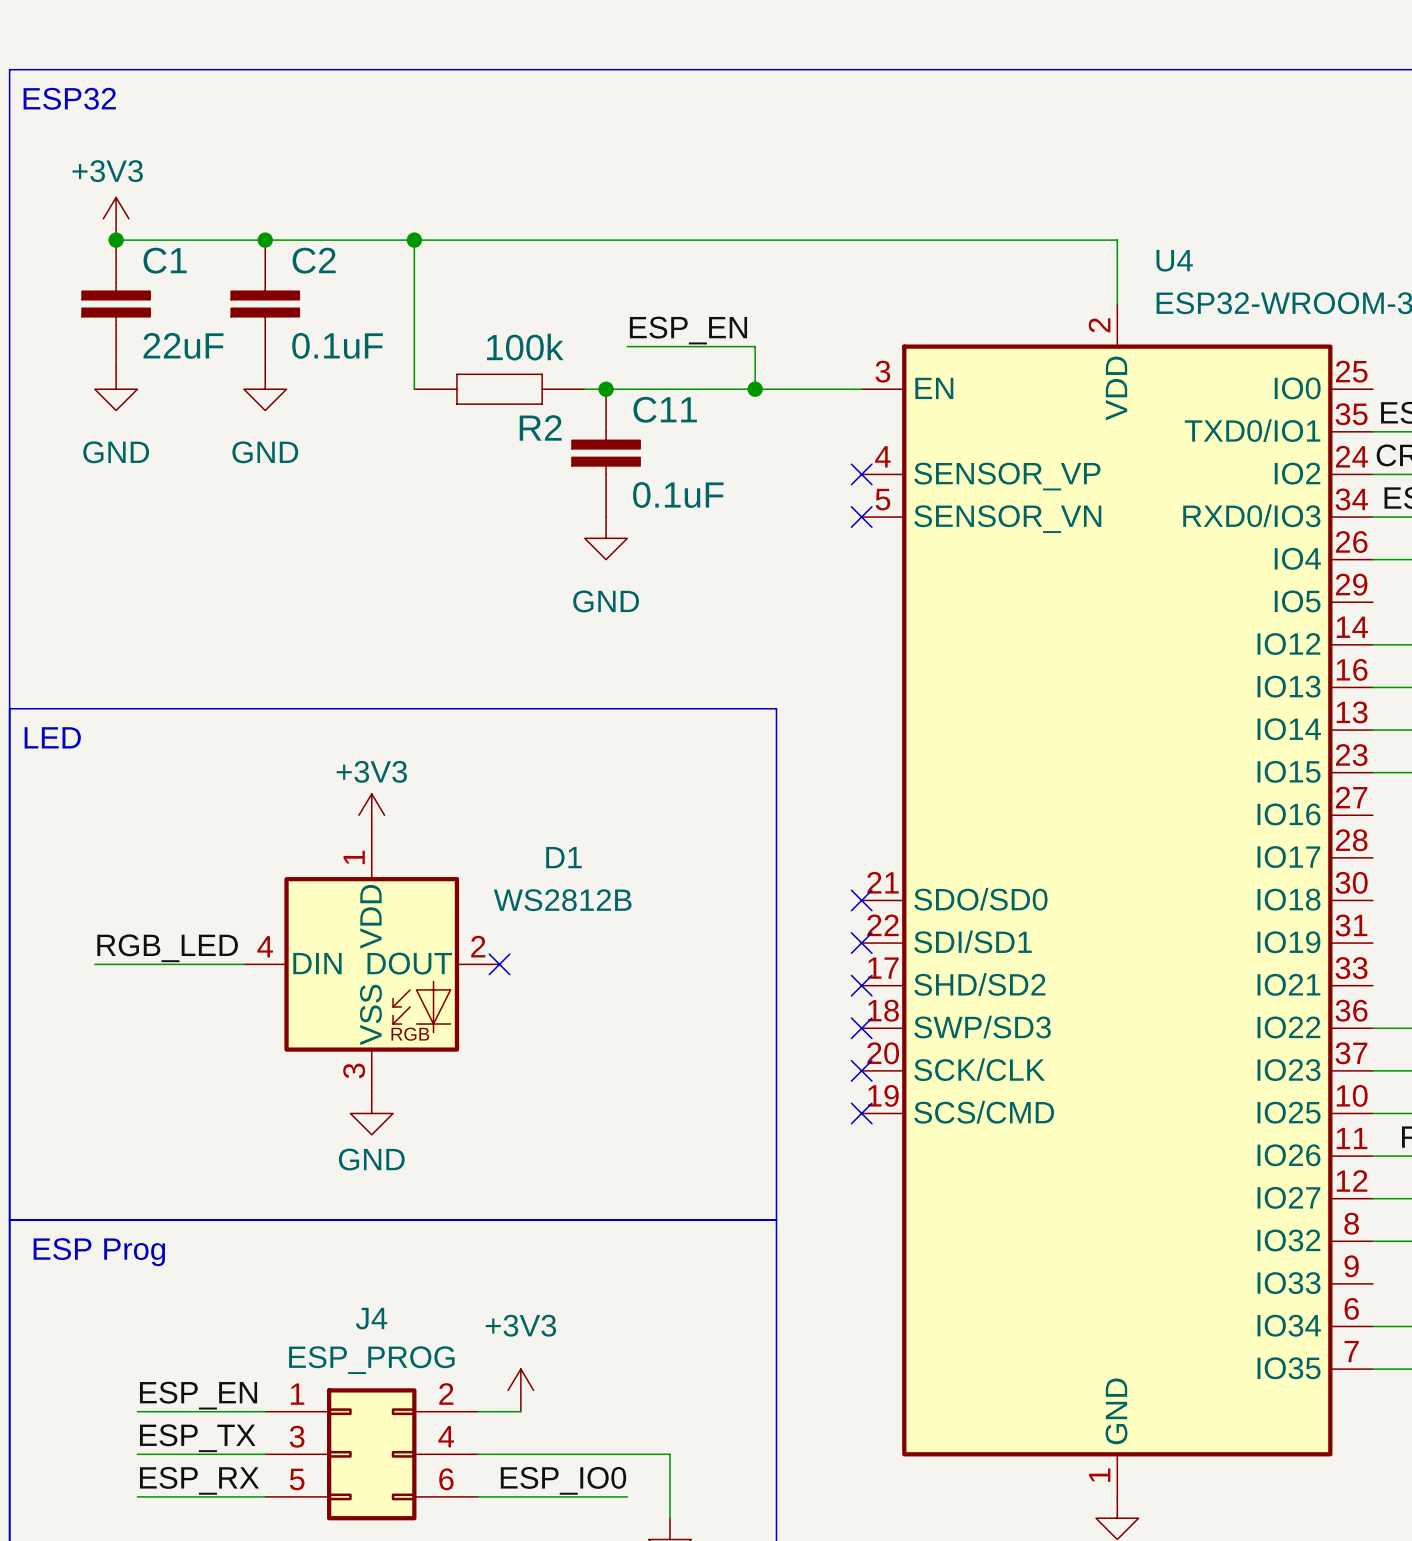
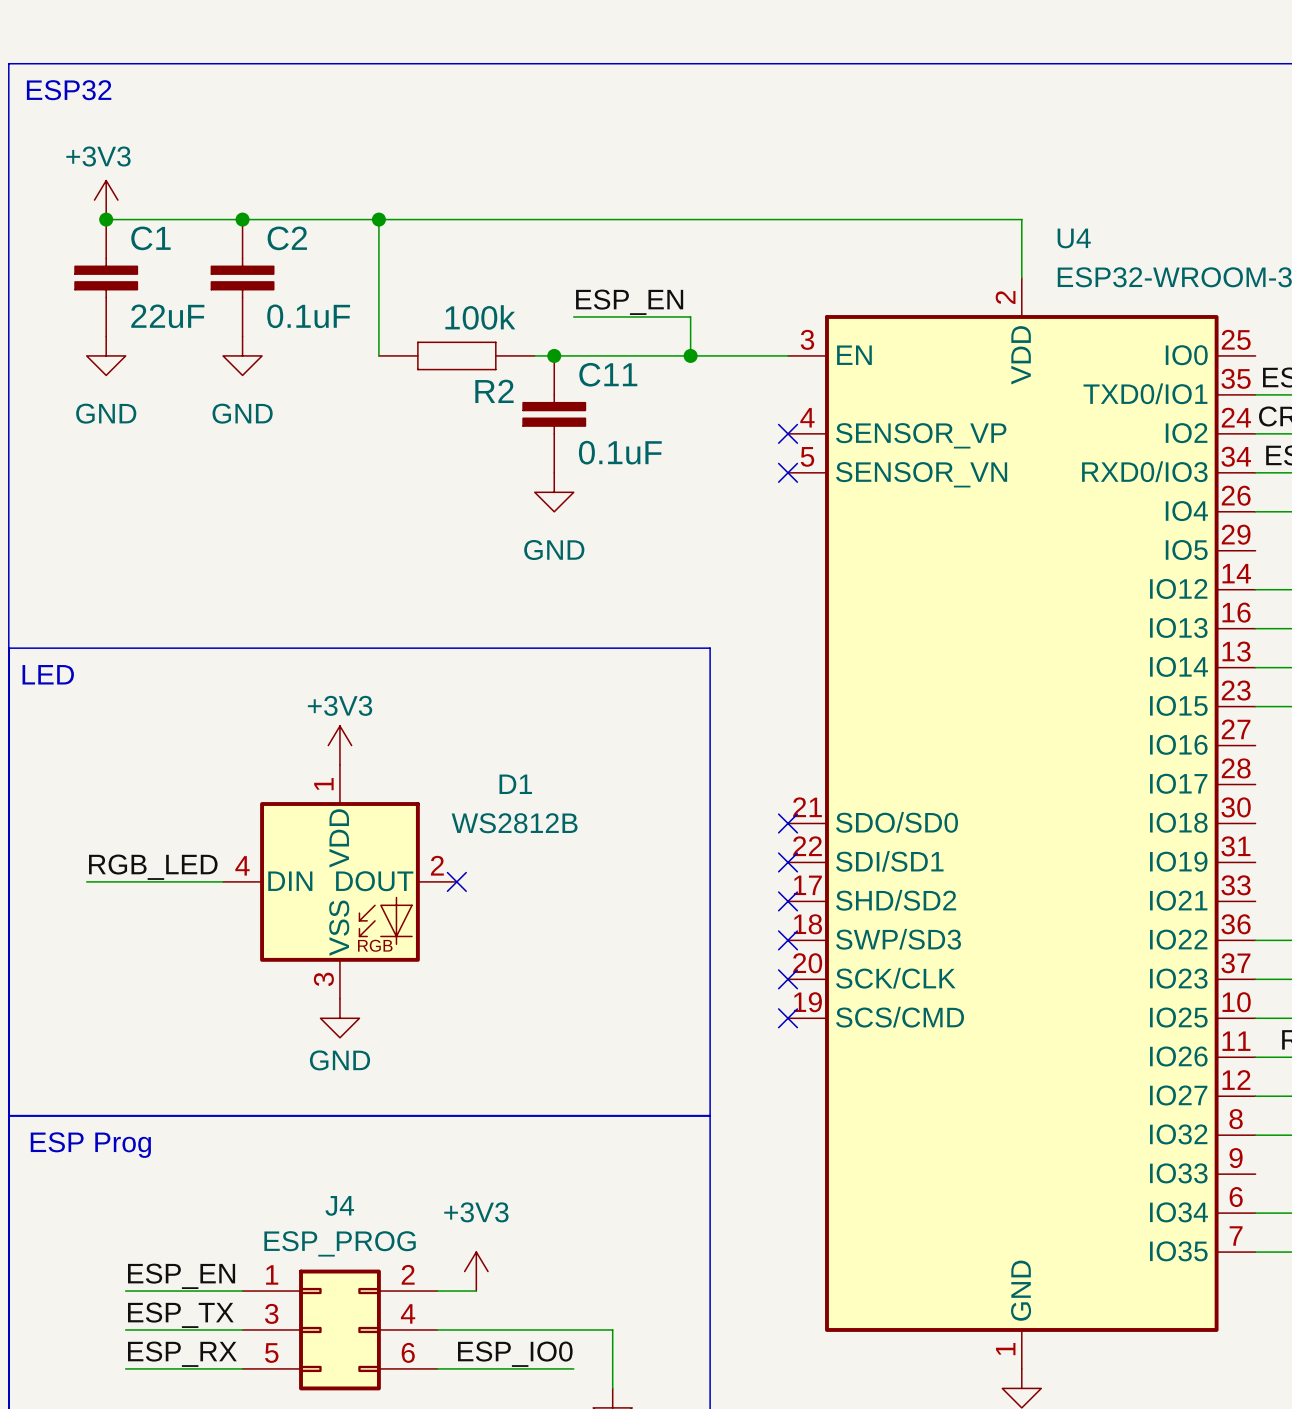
text position: ESP32 (69, 98) -> ESP32 (69, 90)

